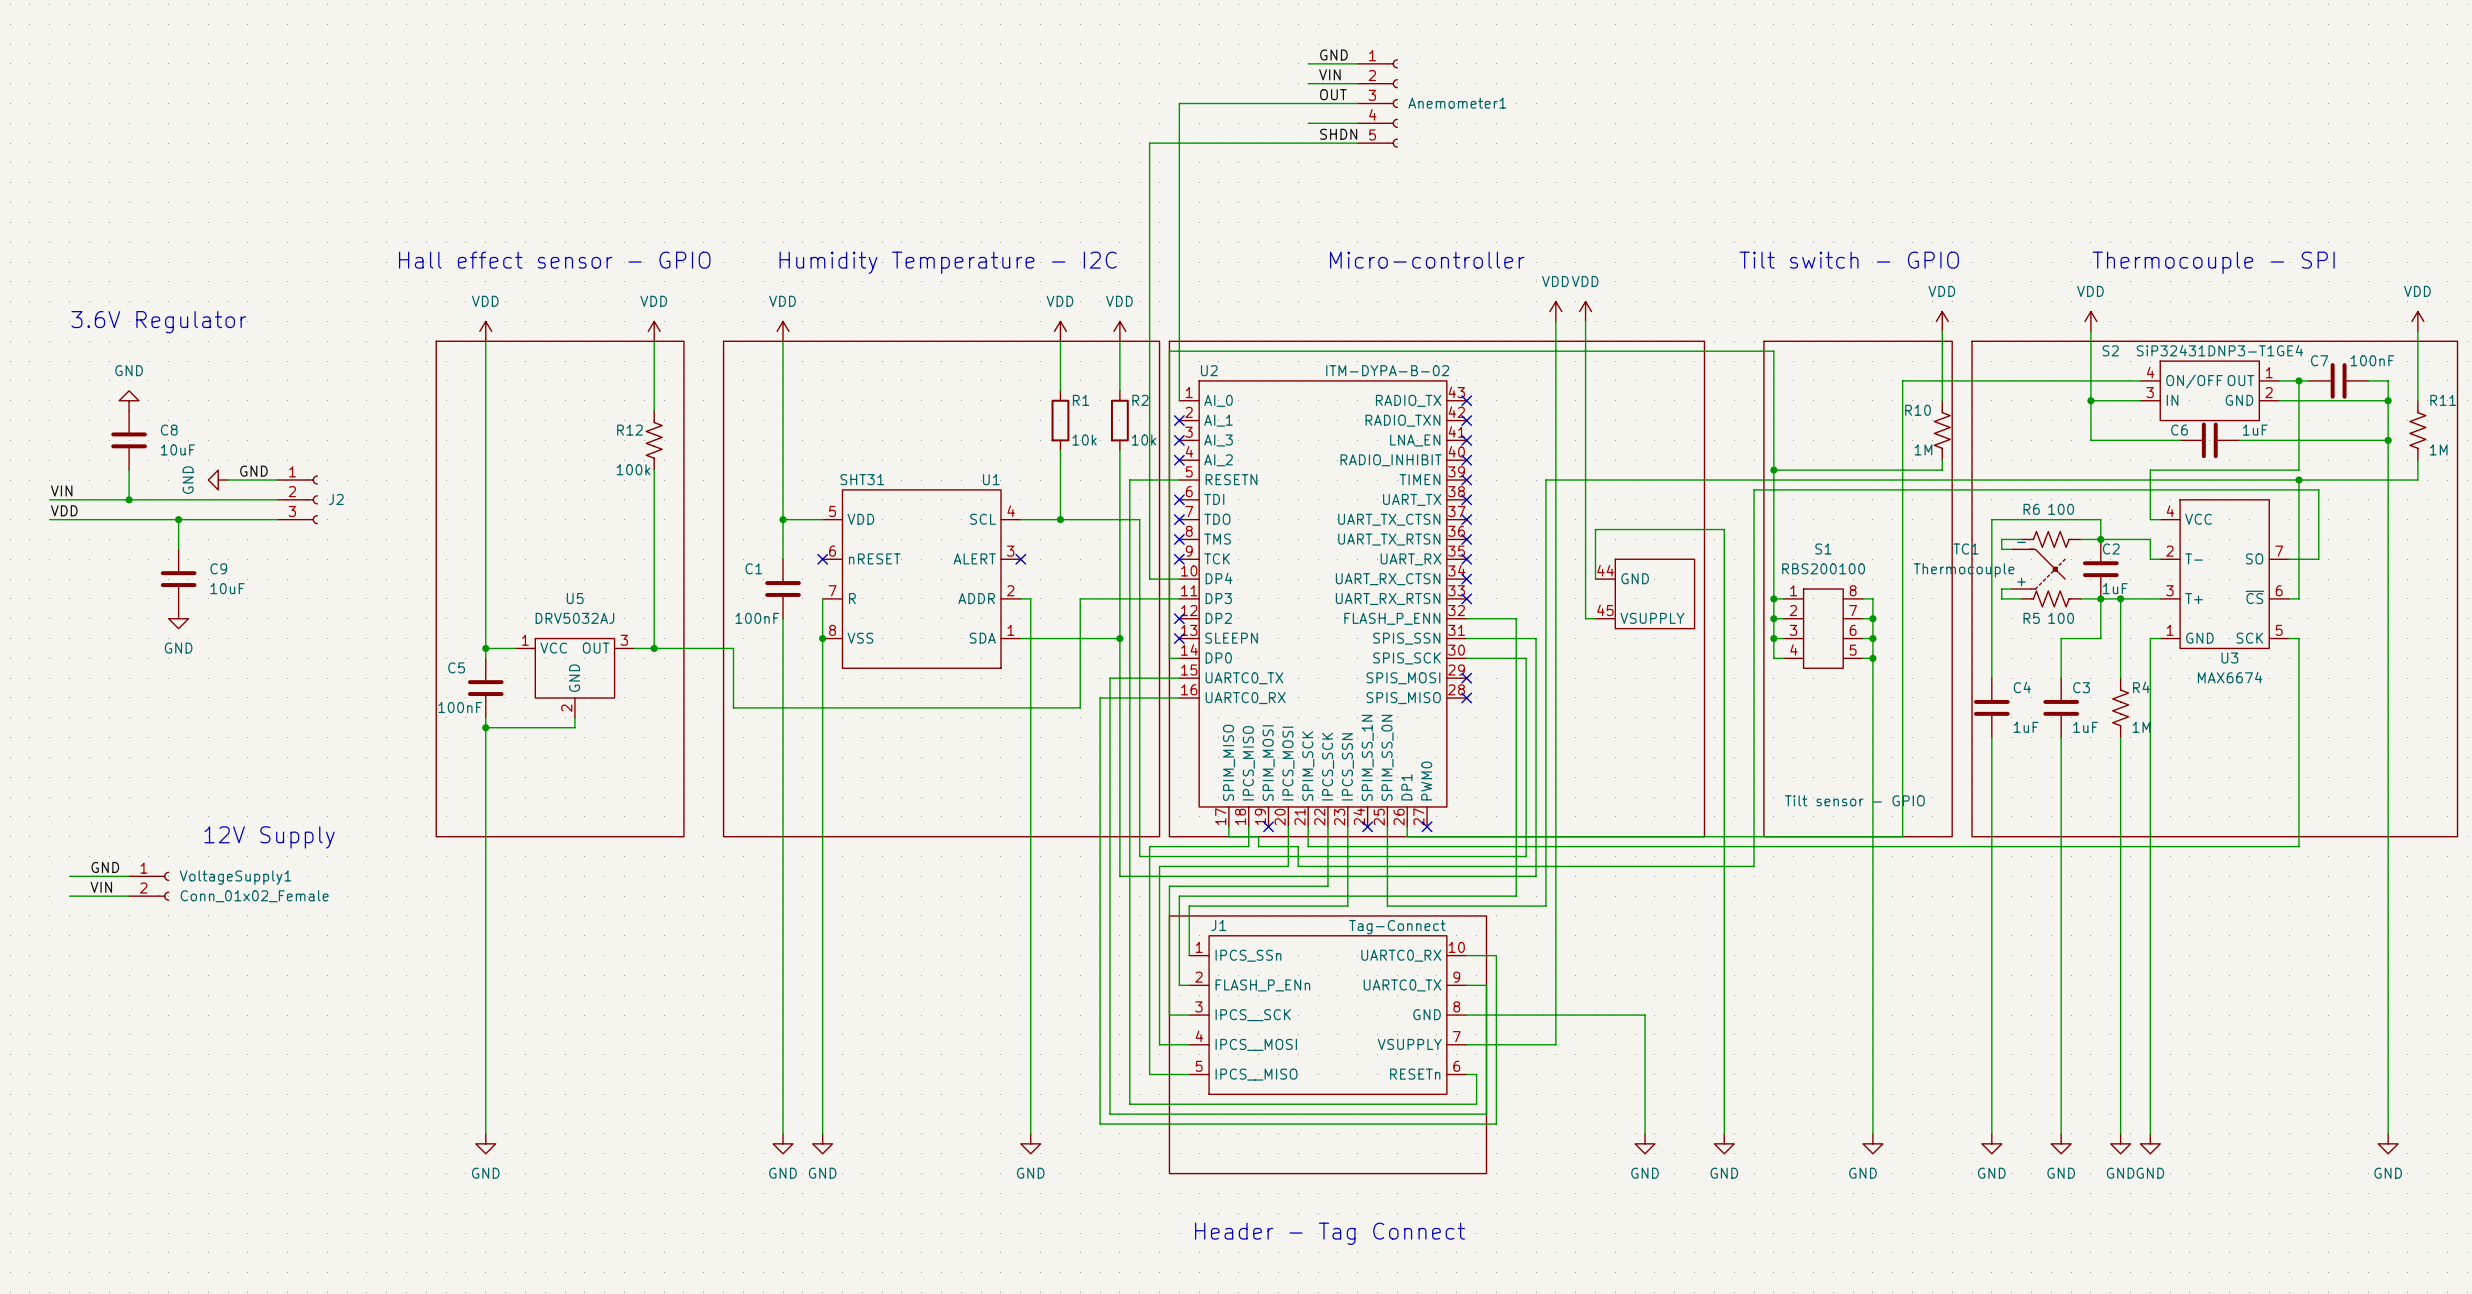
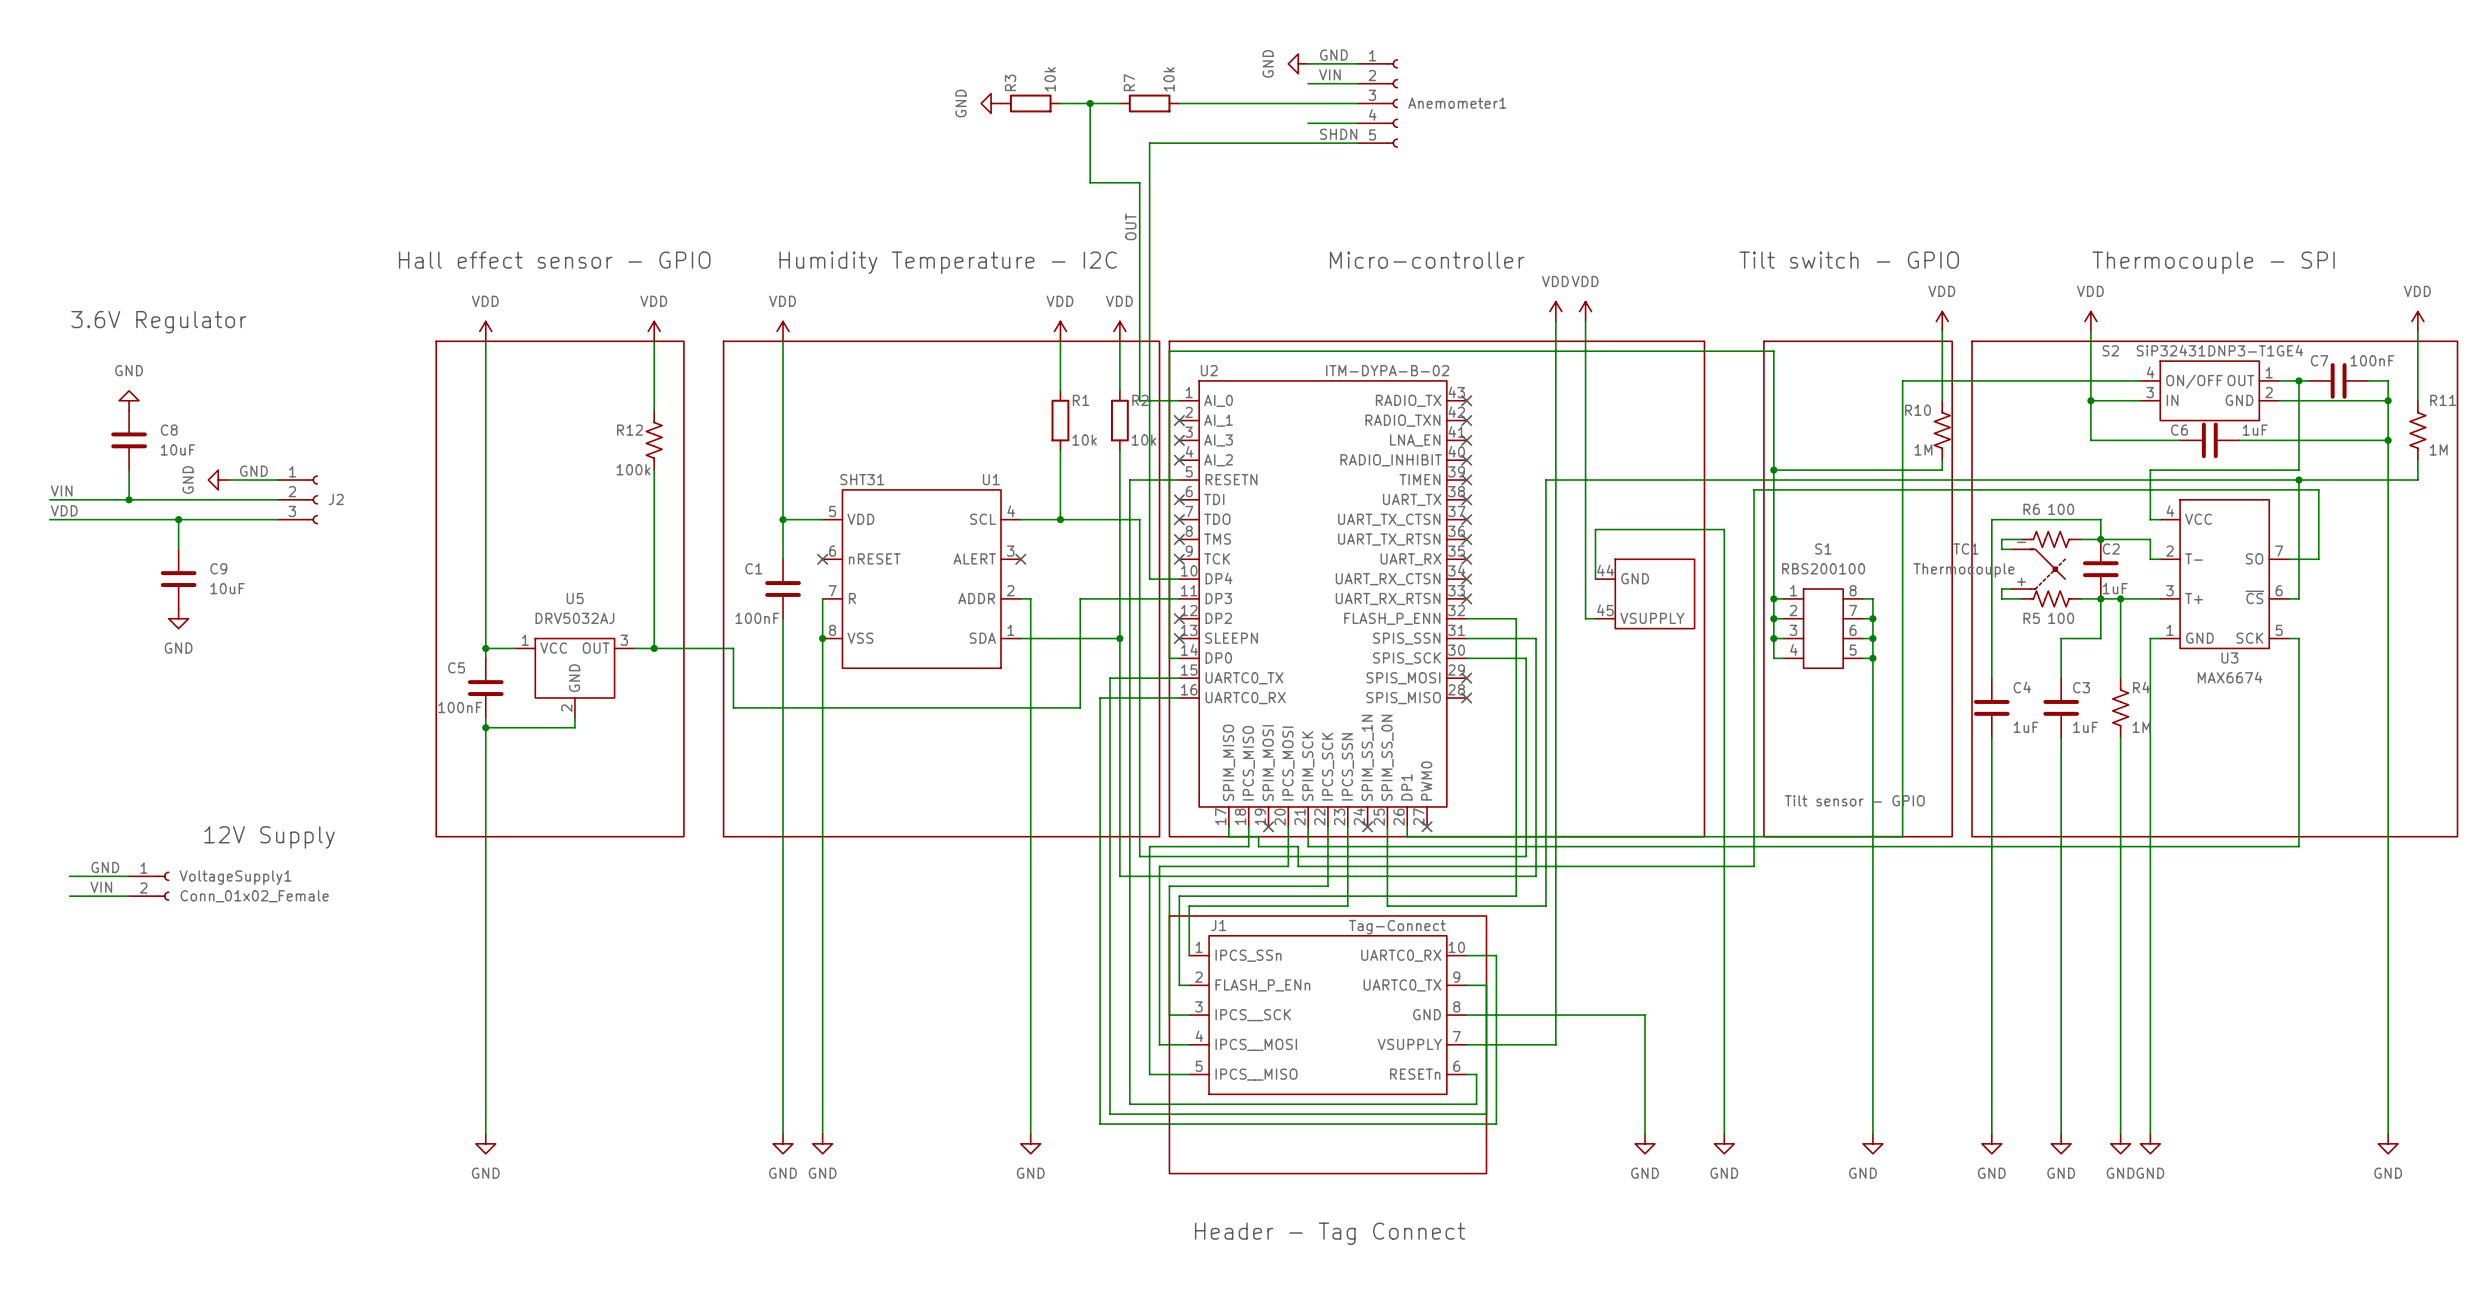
power symbol: none -> GND (1298, 63)
label: OUT (1333, 94) -> none
power symbol: none -> GND (991, 103)
R3: none -> 10k (1030, 103)
wire: none -> (1060, 103) (1119, 103)
junction: none -> (1090, 103)
R7: none -> 10k (1149, 103)
wire: (1179, 103) (1179, 400) -> (1090, 103) (1090, 182) (1139, 182) (1139, 400) (1179, 400)
label: none -> OUT (1130, 226)

